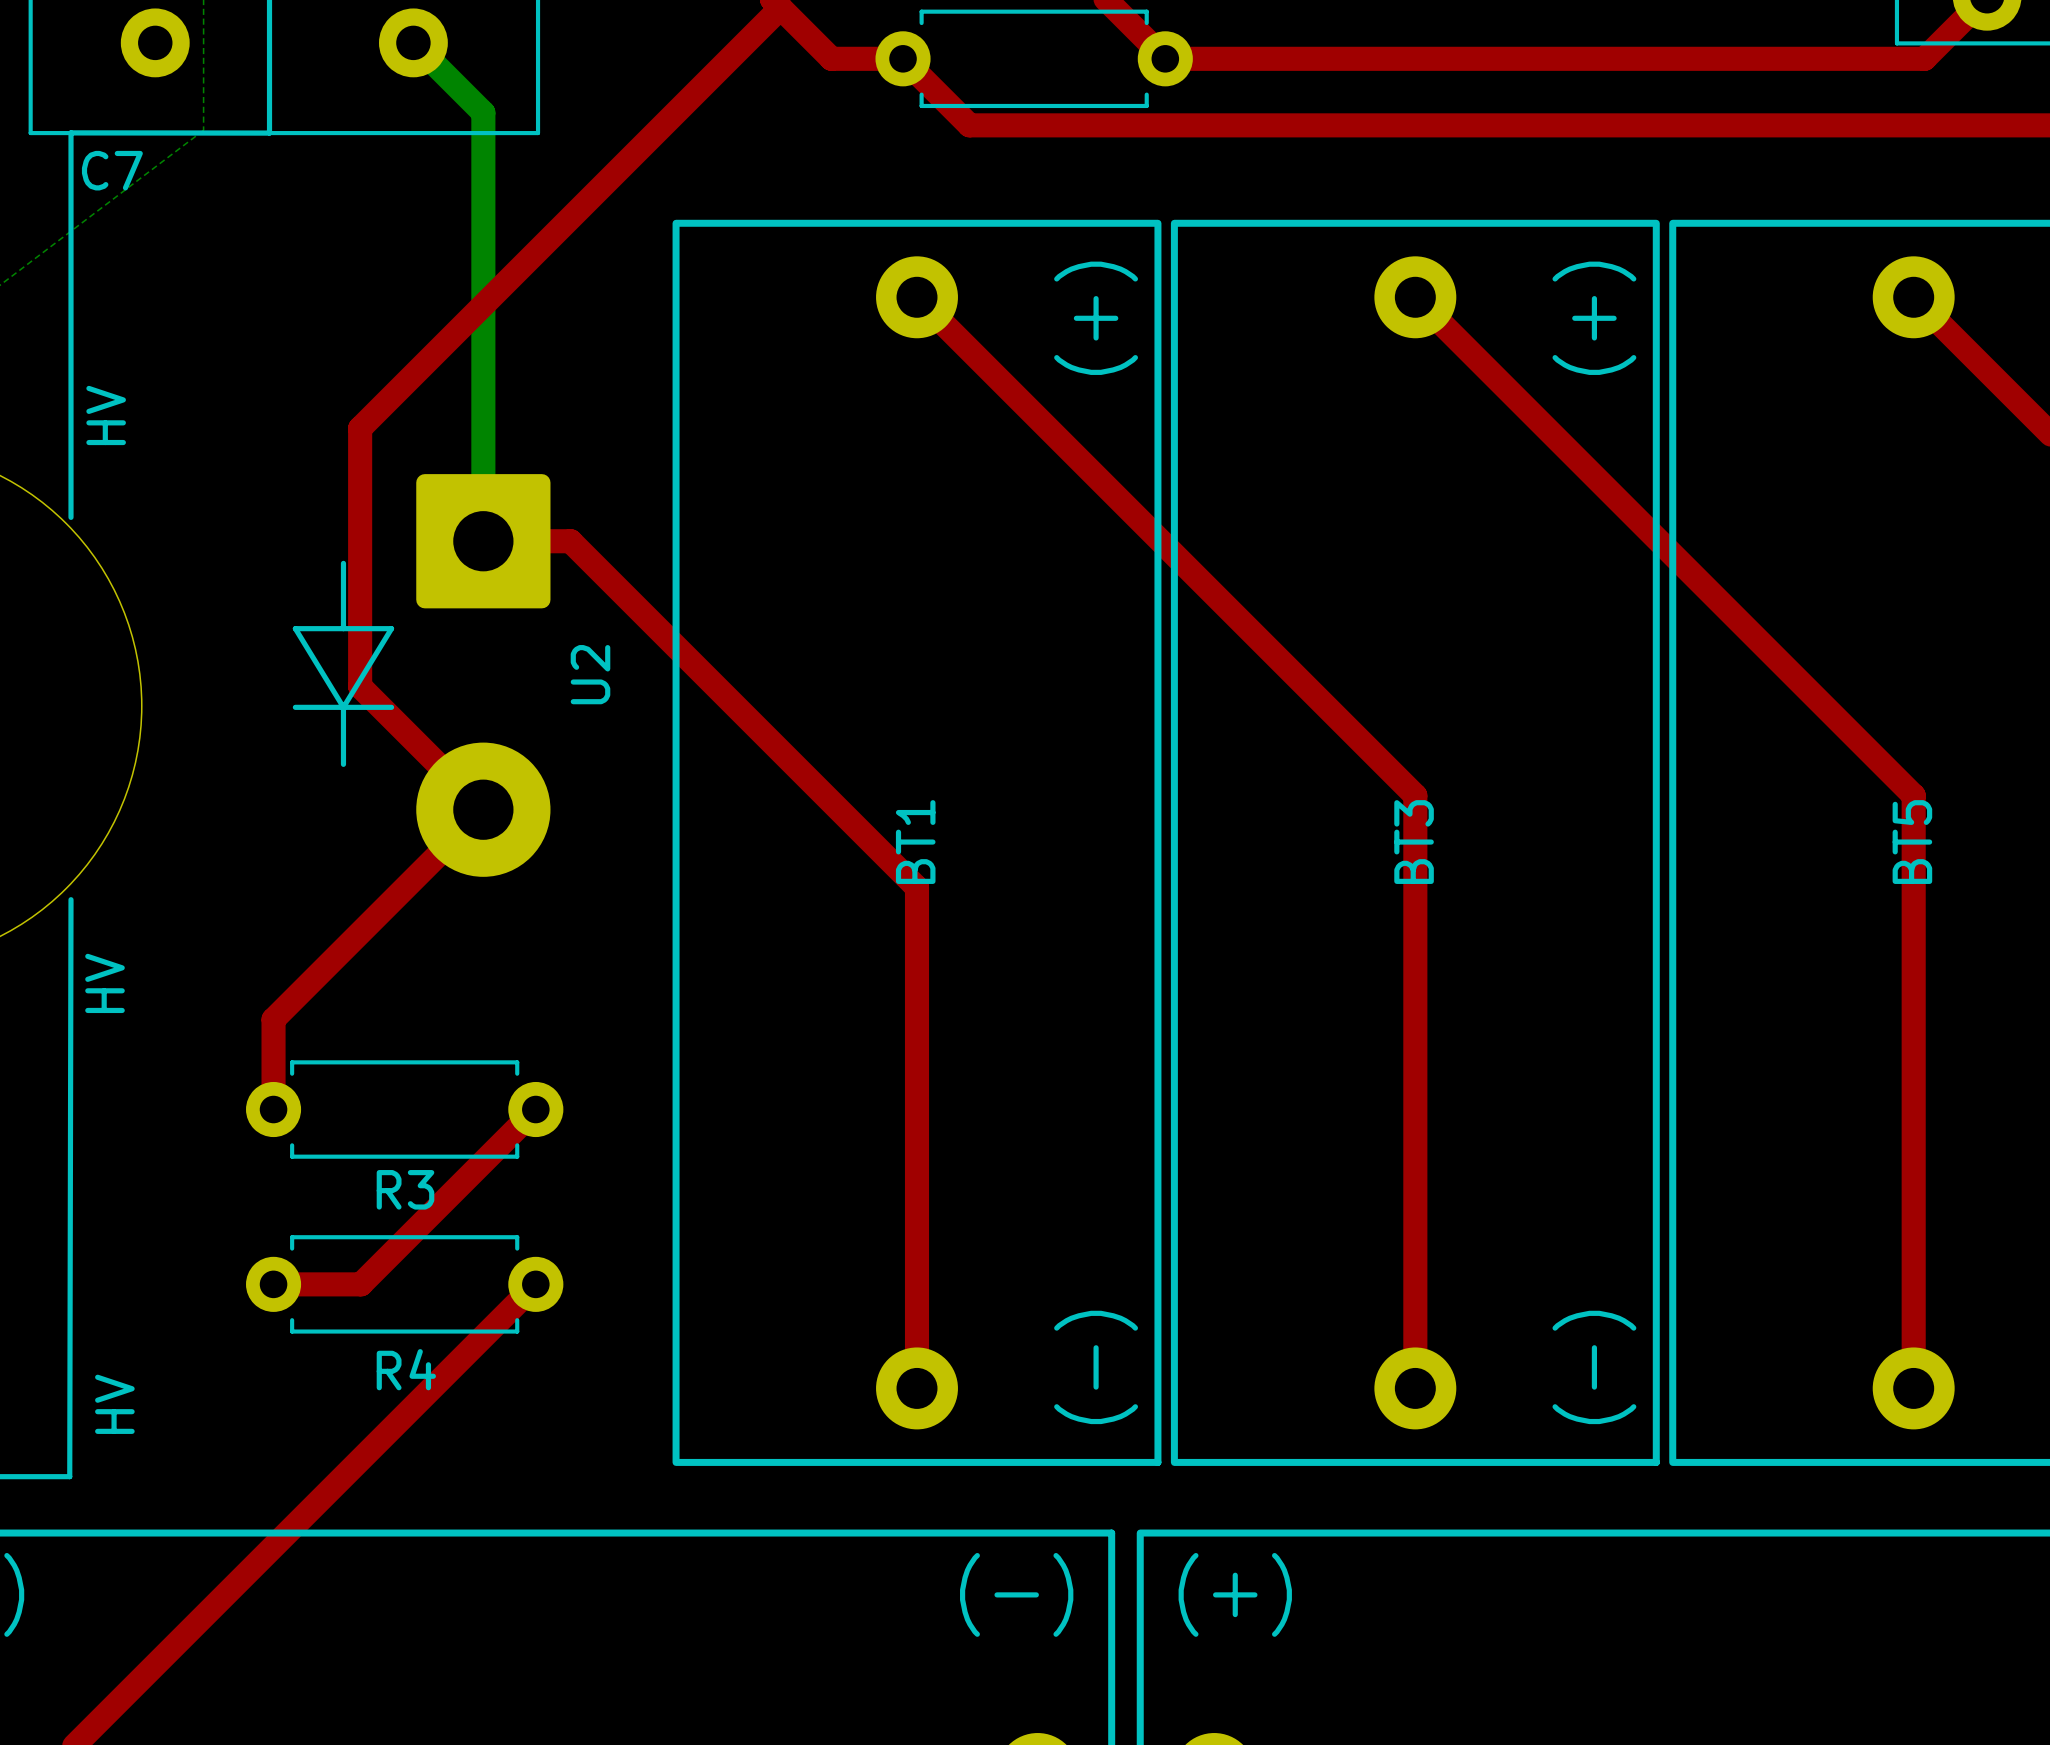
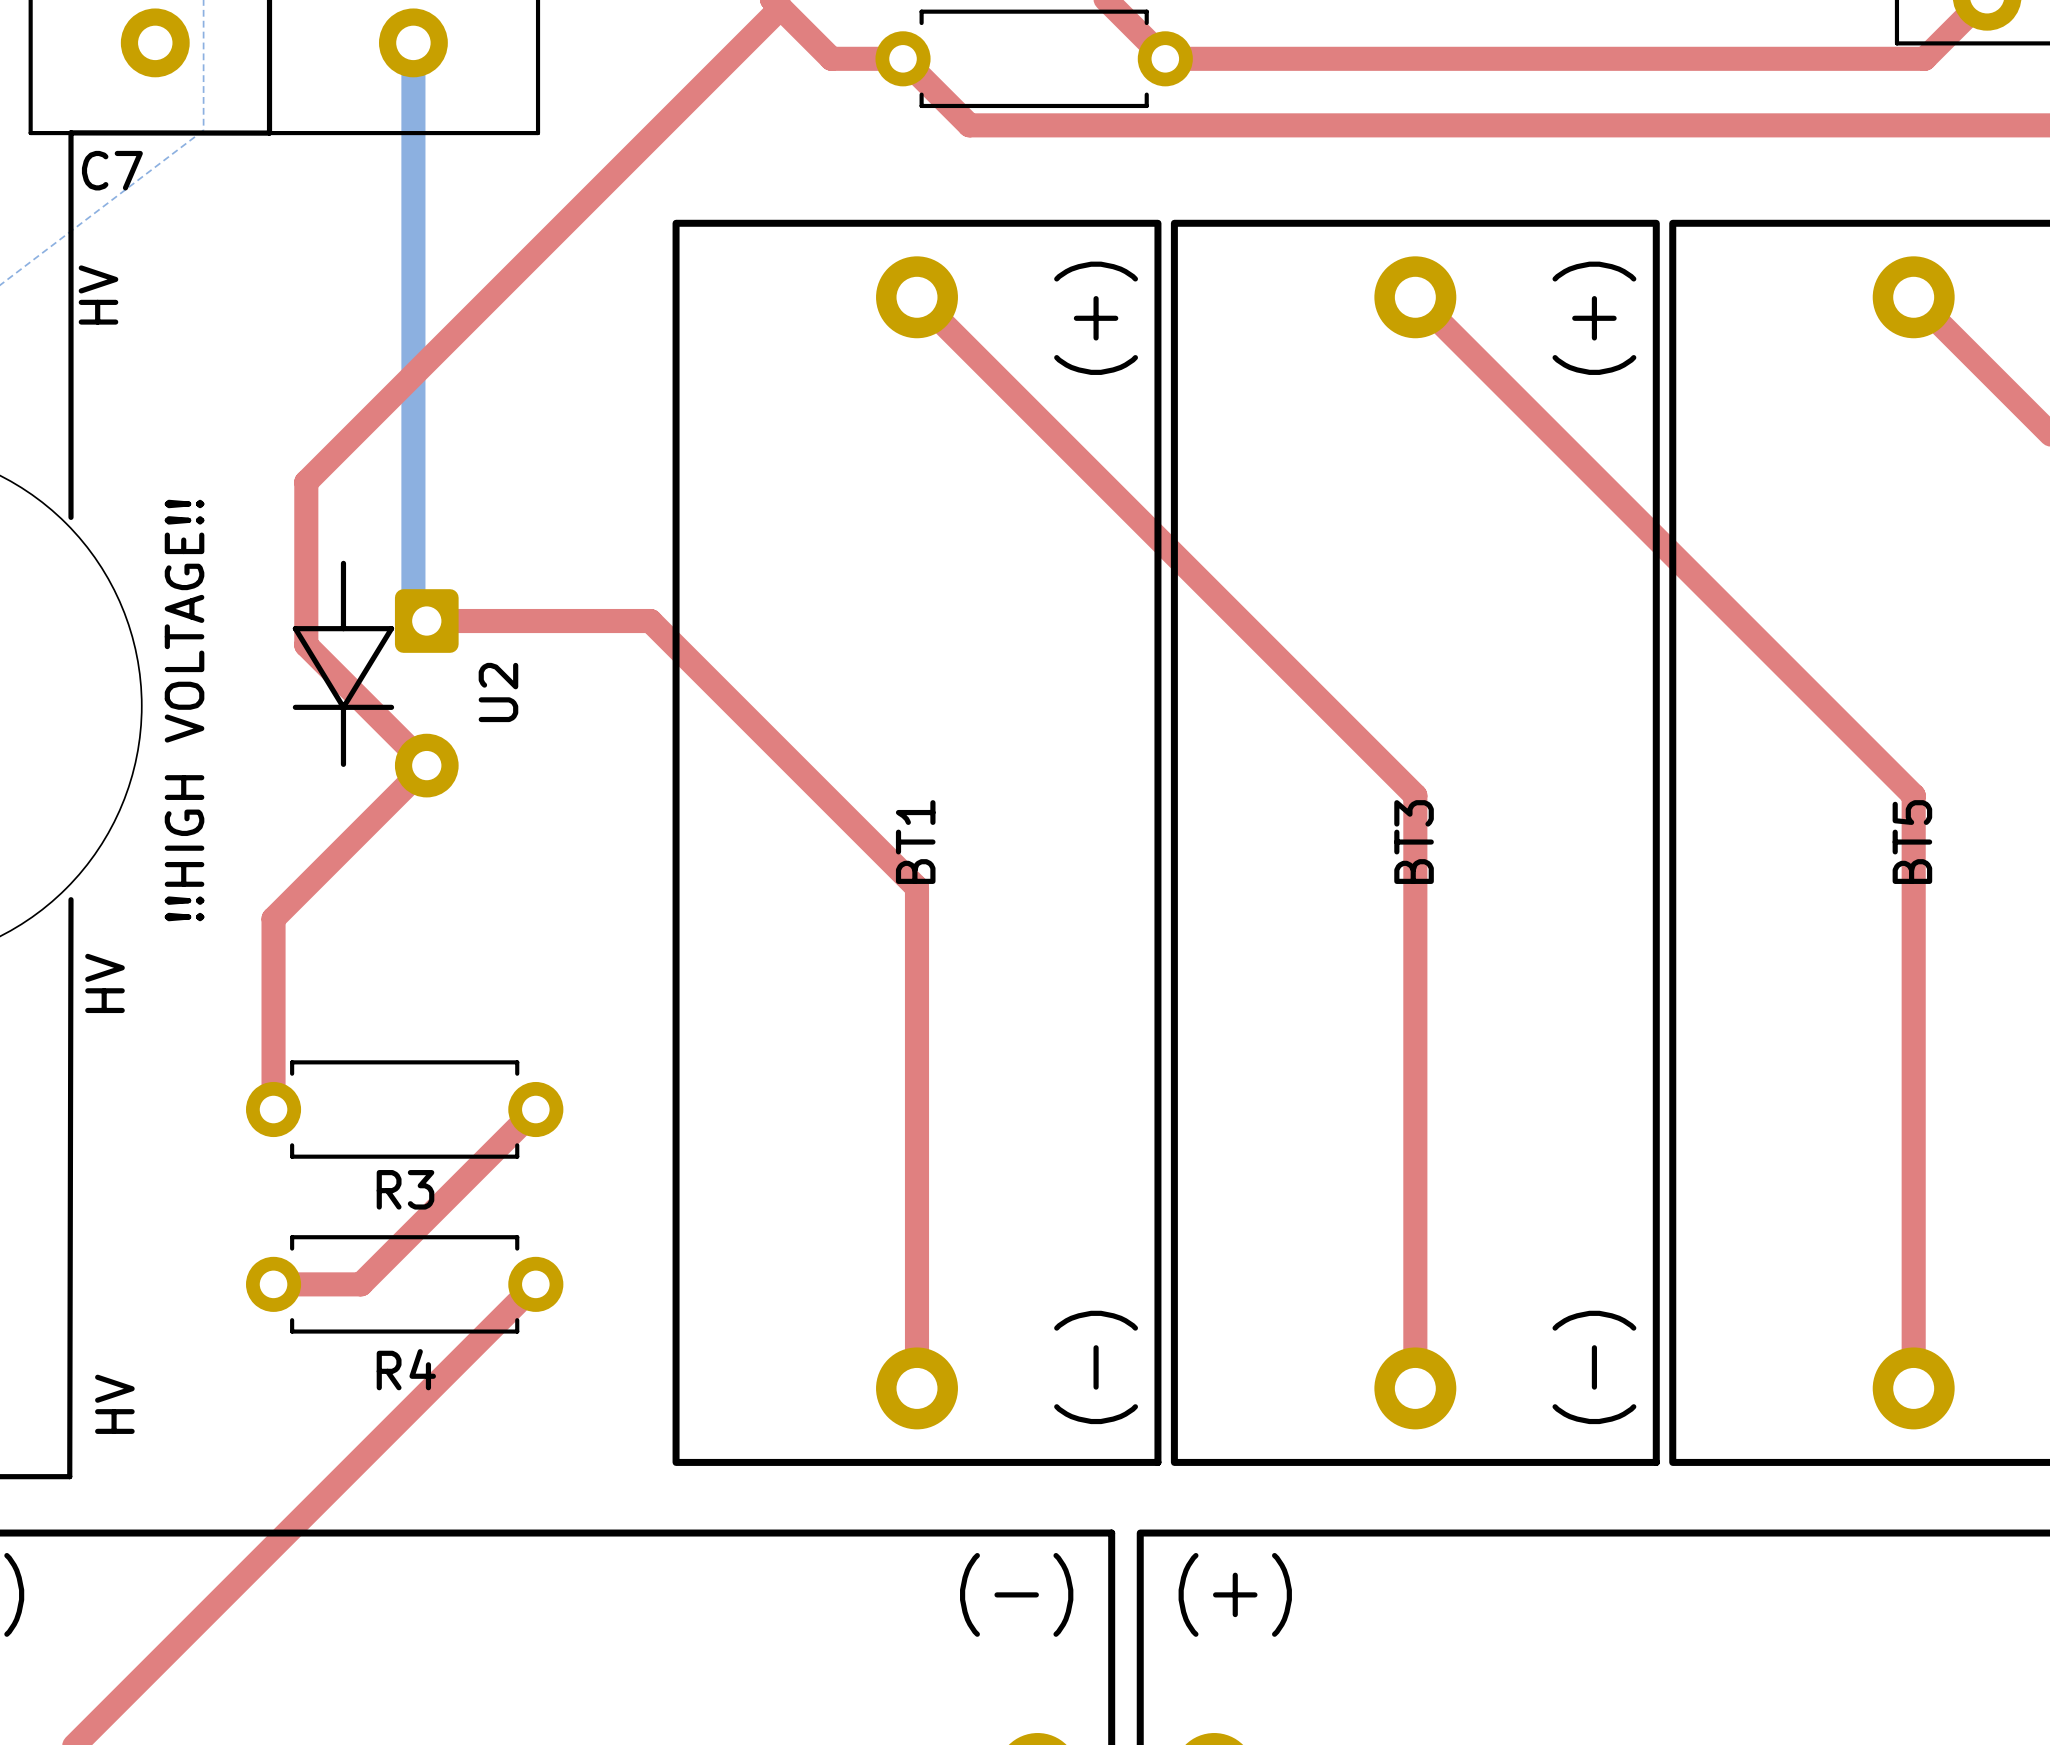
bottom track: (413, 42) (483, 112) (483, 541) -> (413, 42) (413, 607) (426, 621)
text position: HV (106, 415) -> HV (98, 295)
top track: (360, 428) (360, 686) (483, 809) (273, 1019) -> (360, 428) (306, 482) (306, 645) (426, 765) (273, 918) (273, 1019)
U2 footprint: [416, 474, 551, 877] -> [394, 589, 459, 798]
top track: (435, 493) (483, 541) (570, 541) (650, 621) -> (426, 621) (650, 621)
text: none -> !!HIGH VOLTAGE!! (184, 710)

